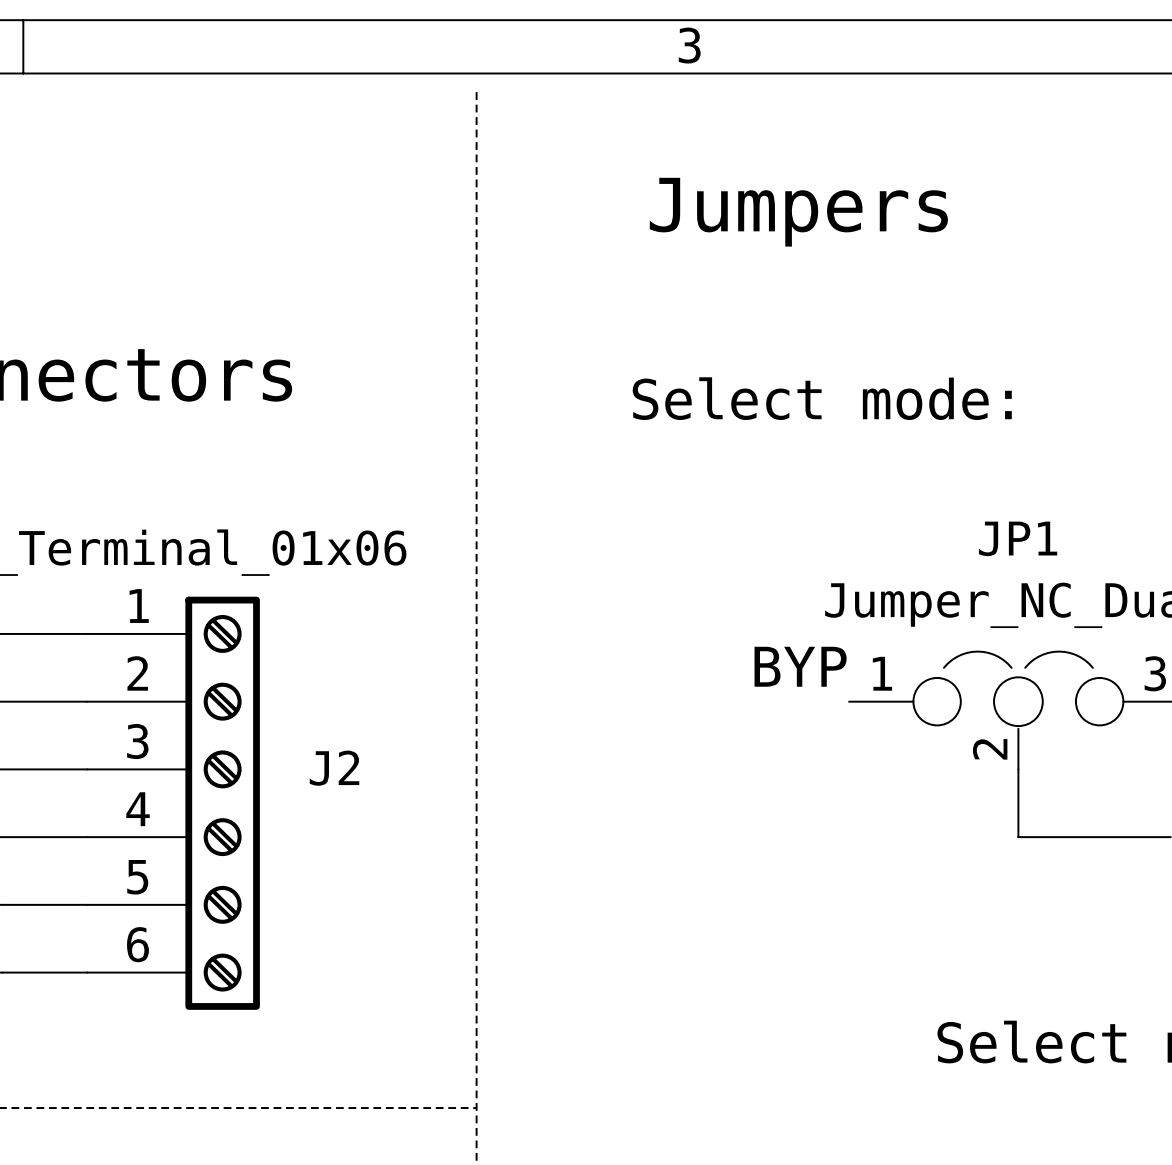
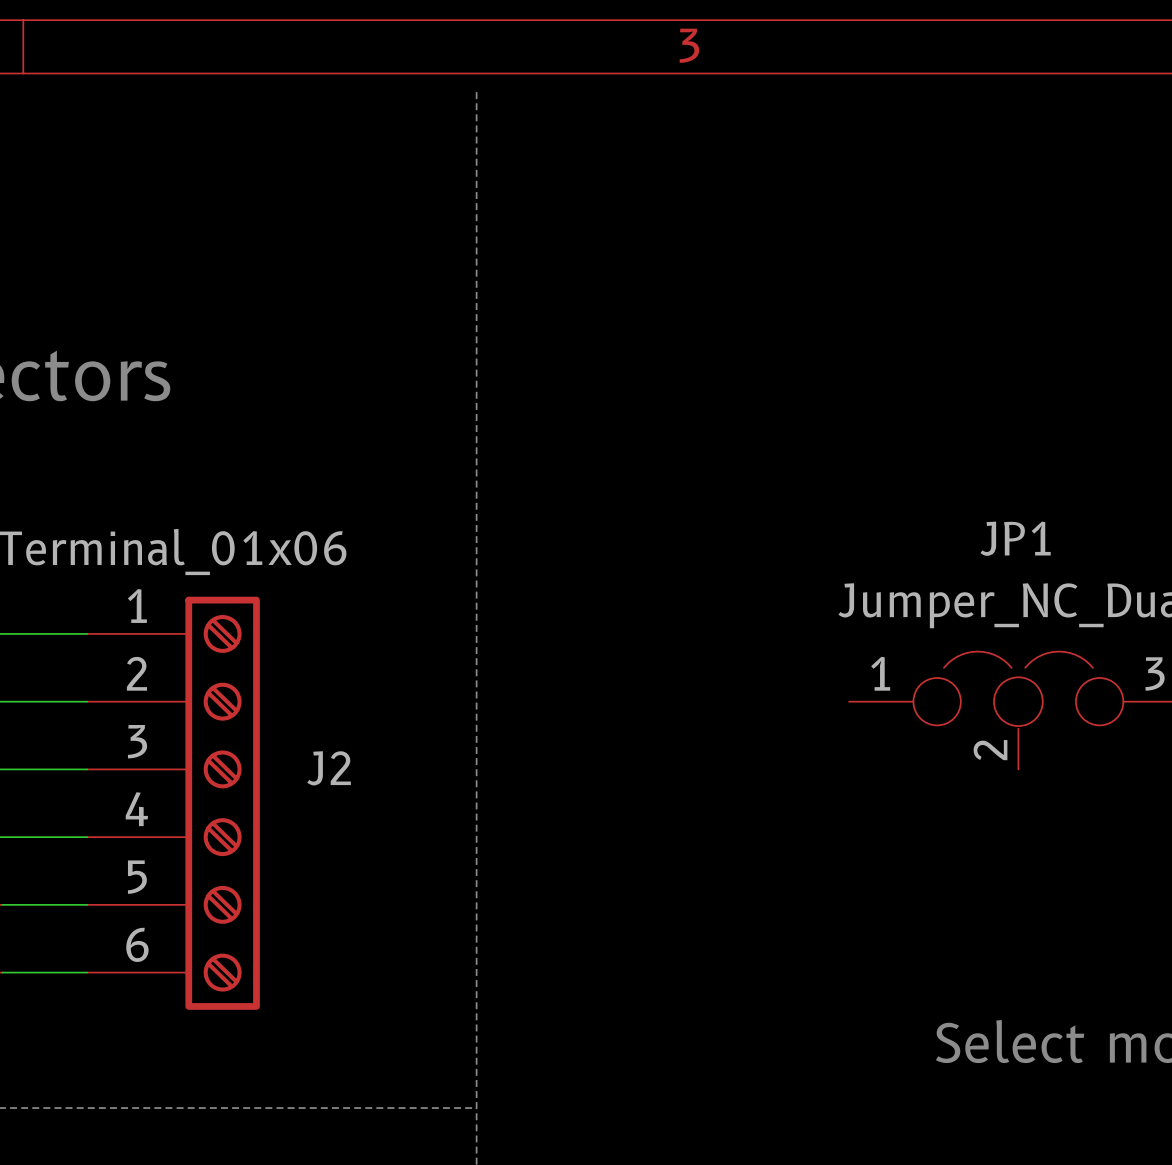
text: Jumpers (798, 212) -> none
text: Select mode: (822, 398) -> none
label: BYP (800, 666) -> none
wire: (1018, 769) (1018, 837) (1170, 837) -> none

